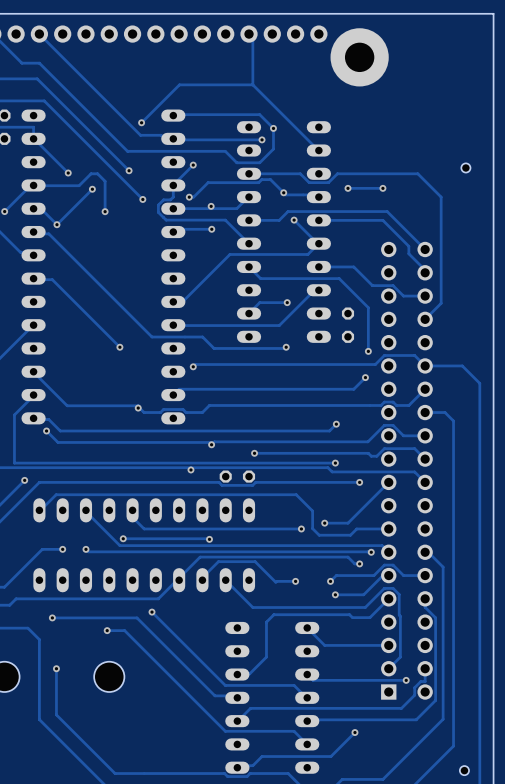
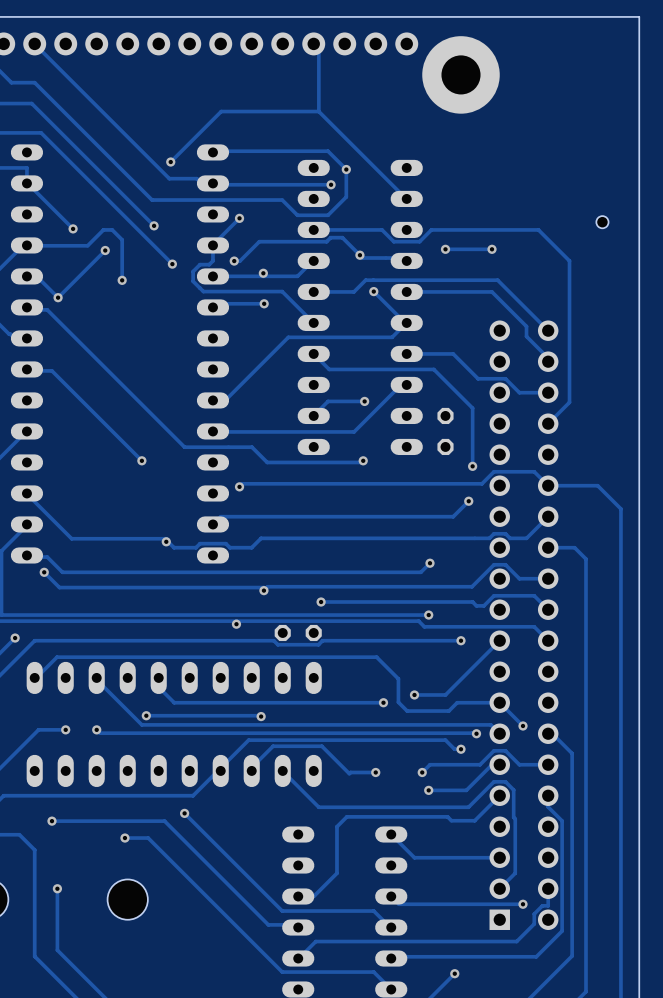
track: none -> (499, 702) (523, 725)
via: none -> (523, 725)

